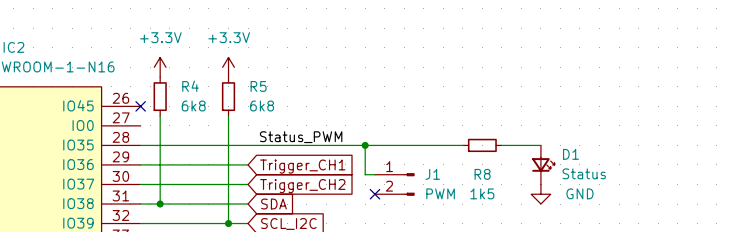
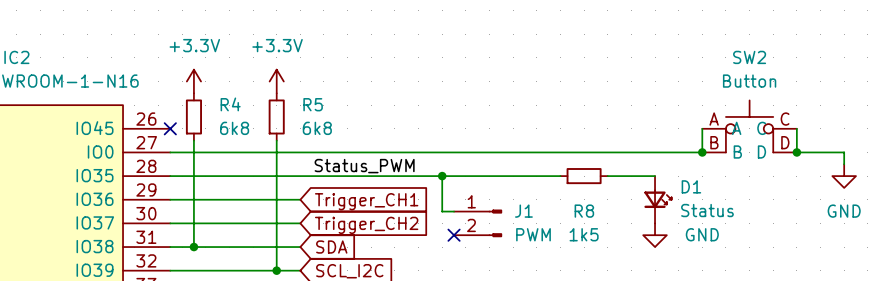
SW2: none -> Button (749, 126)
wire: none -> (702, 128) (702, 152) (170, 152)
wire: none -> (796, 128) (796, 152) (844, 152) (844, 164)
junction: none -> (702, 152)
junction: none -> (796, 152)
power symbol: none -> GND (844, 176)

